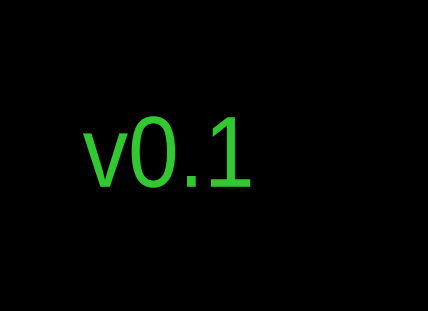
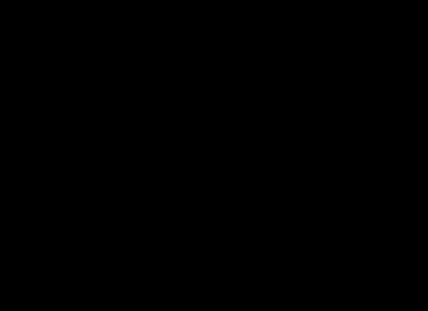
text: v0.1 (166, 151) -> none

